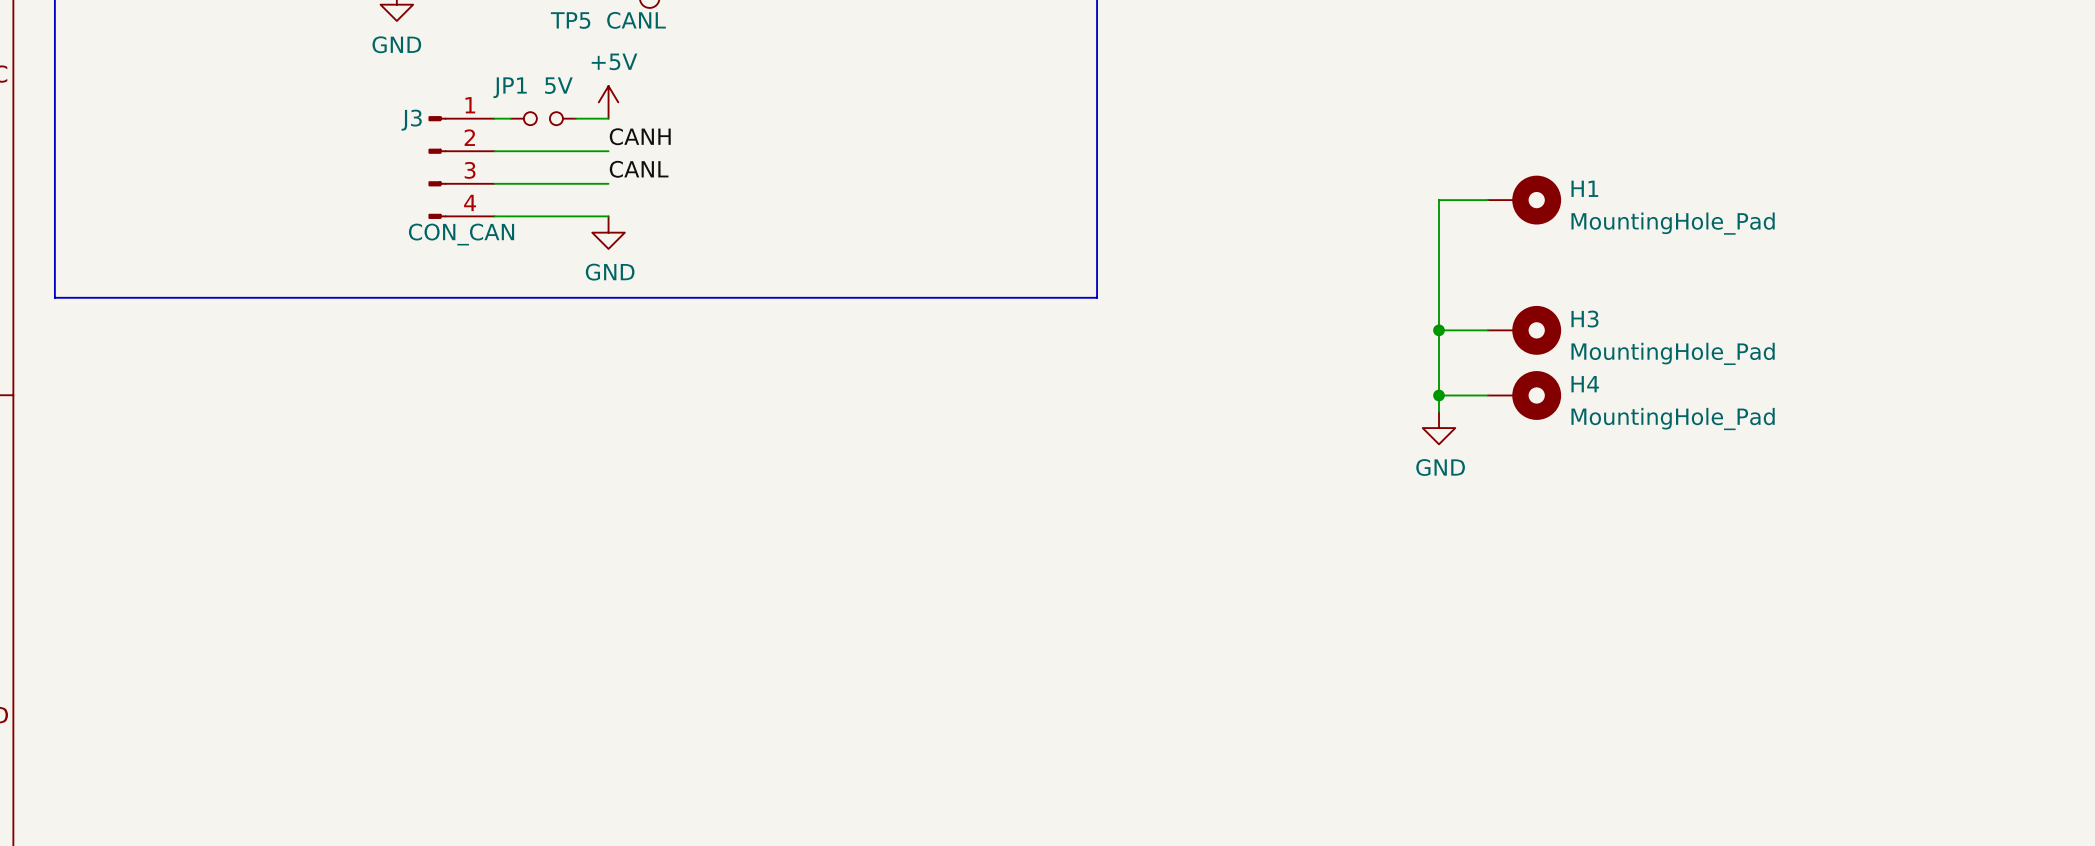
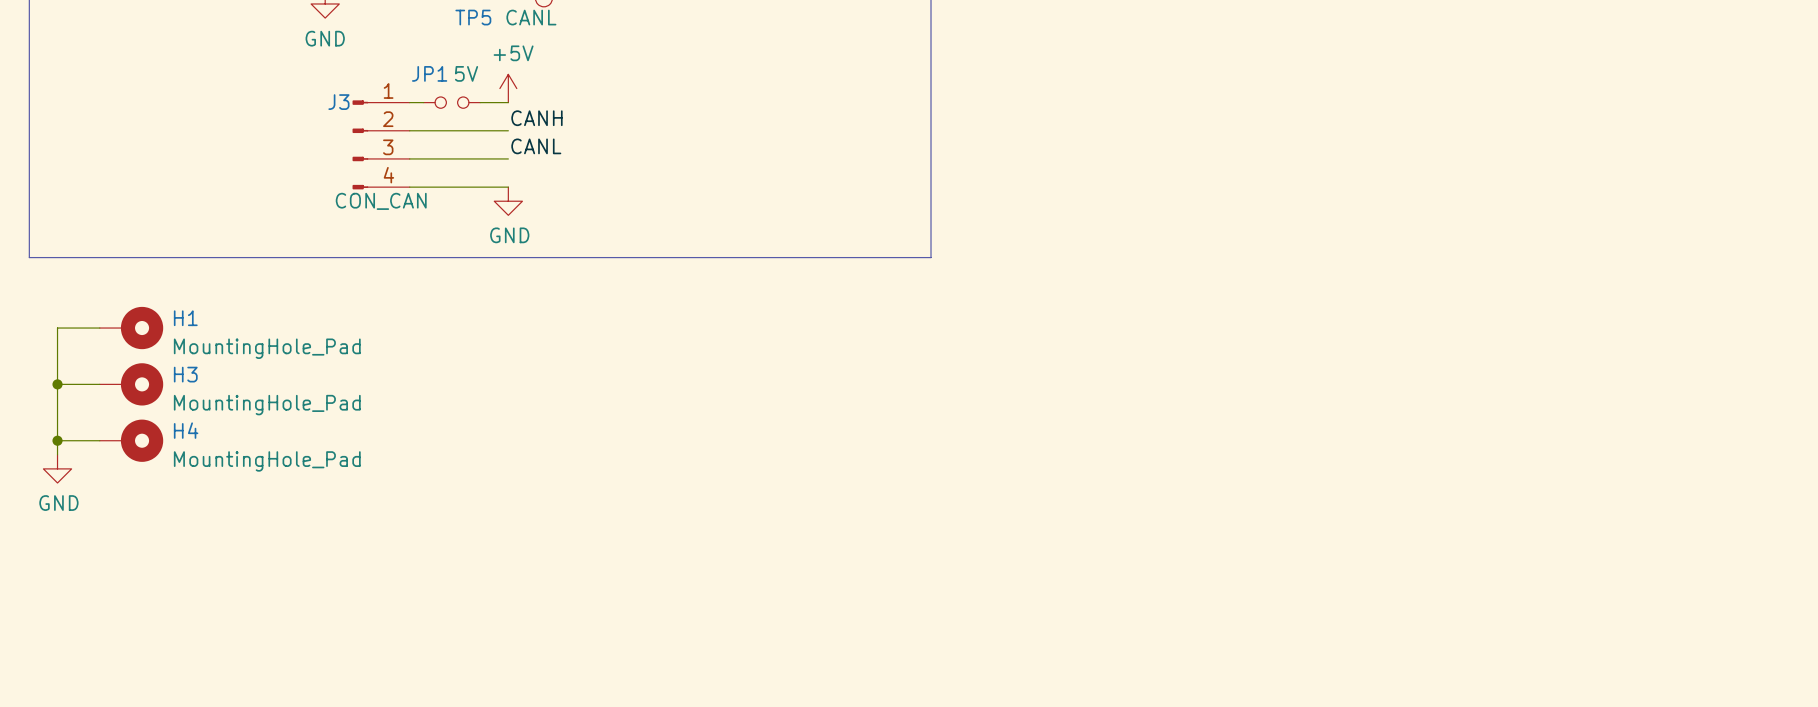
wire: (1487, 200) (1439, 200) (1439, 411) -> none
H1 position: (1524, 200) -> (131, 328)
wire: (1439, 330) (1487, 330) -> none
junction: (1439, 330) -> none
H3 position: (1524, 330) -> (131, 384)
wire: none -> (99, 328) (57, 328) (57, 454)
wire: (1439, 395) (1487, 395) -> none
junction: (1439, 395) -> none
H4 position: (1524, 395) -> (131, 440)
power symbol: GND (1439, 428) -> none
wire: none -> (57, 384) (99, 384)
junction: none -> (57, 384)
wire: none -> (57, 440) (99, 440)
junction: none -> (57, 440)
power symbol: none -> GND (57, 468)

